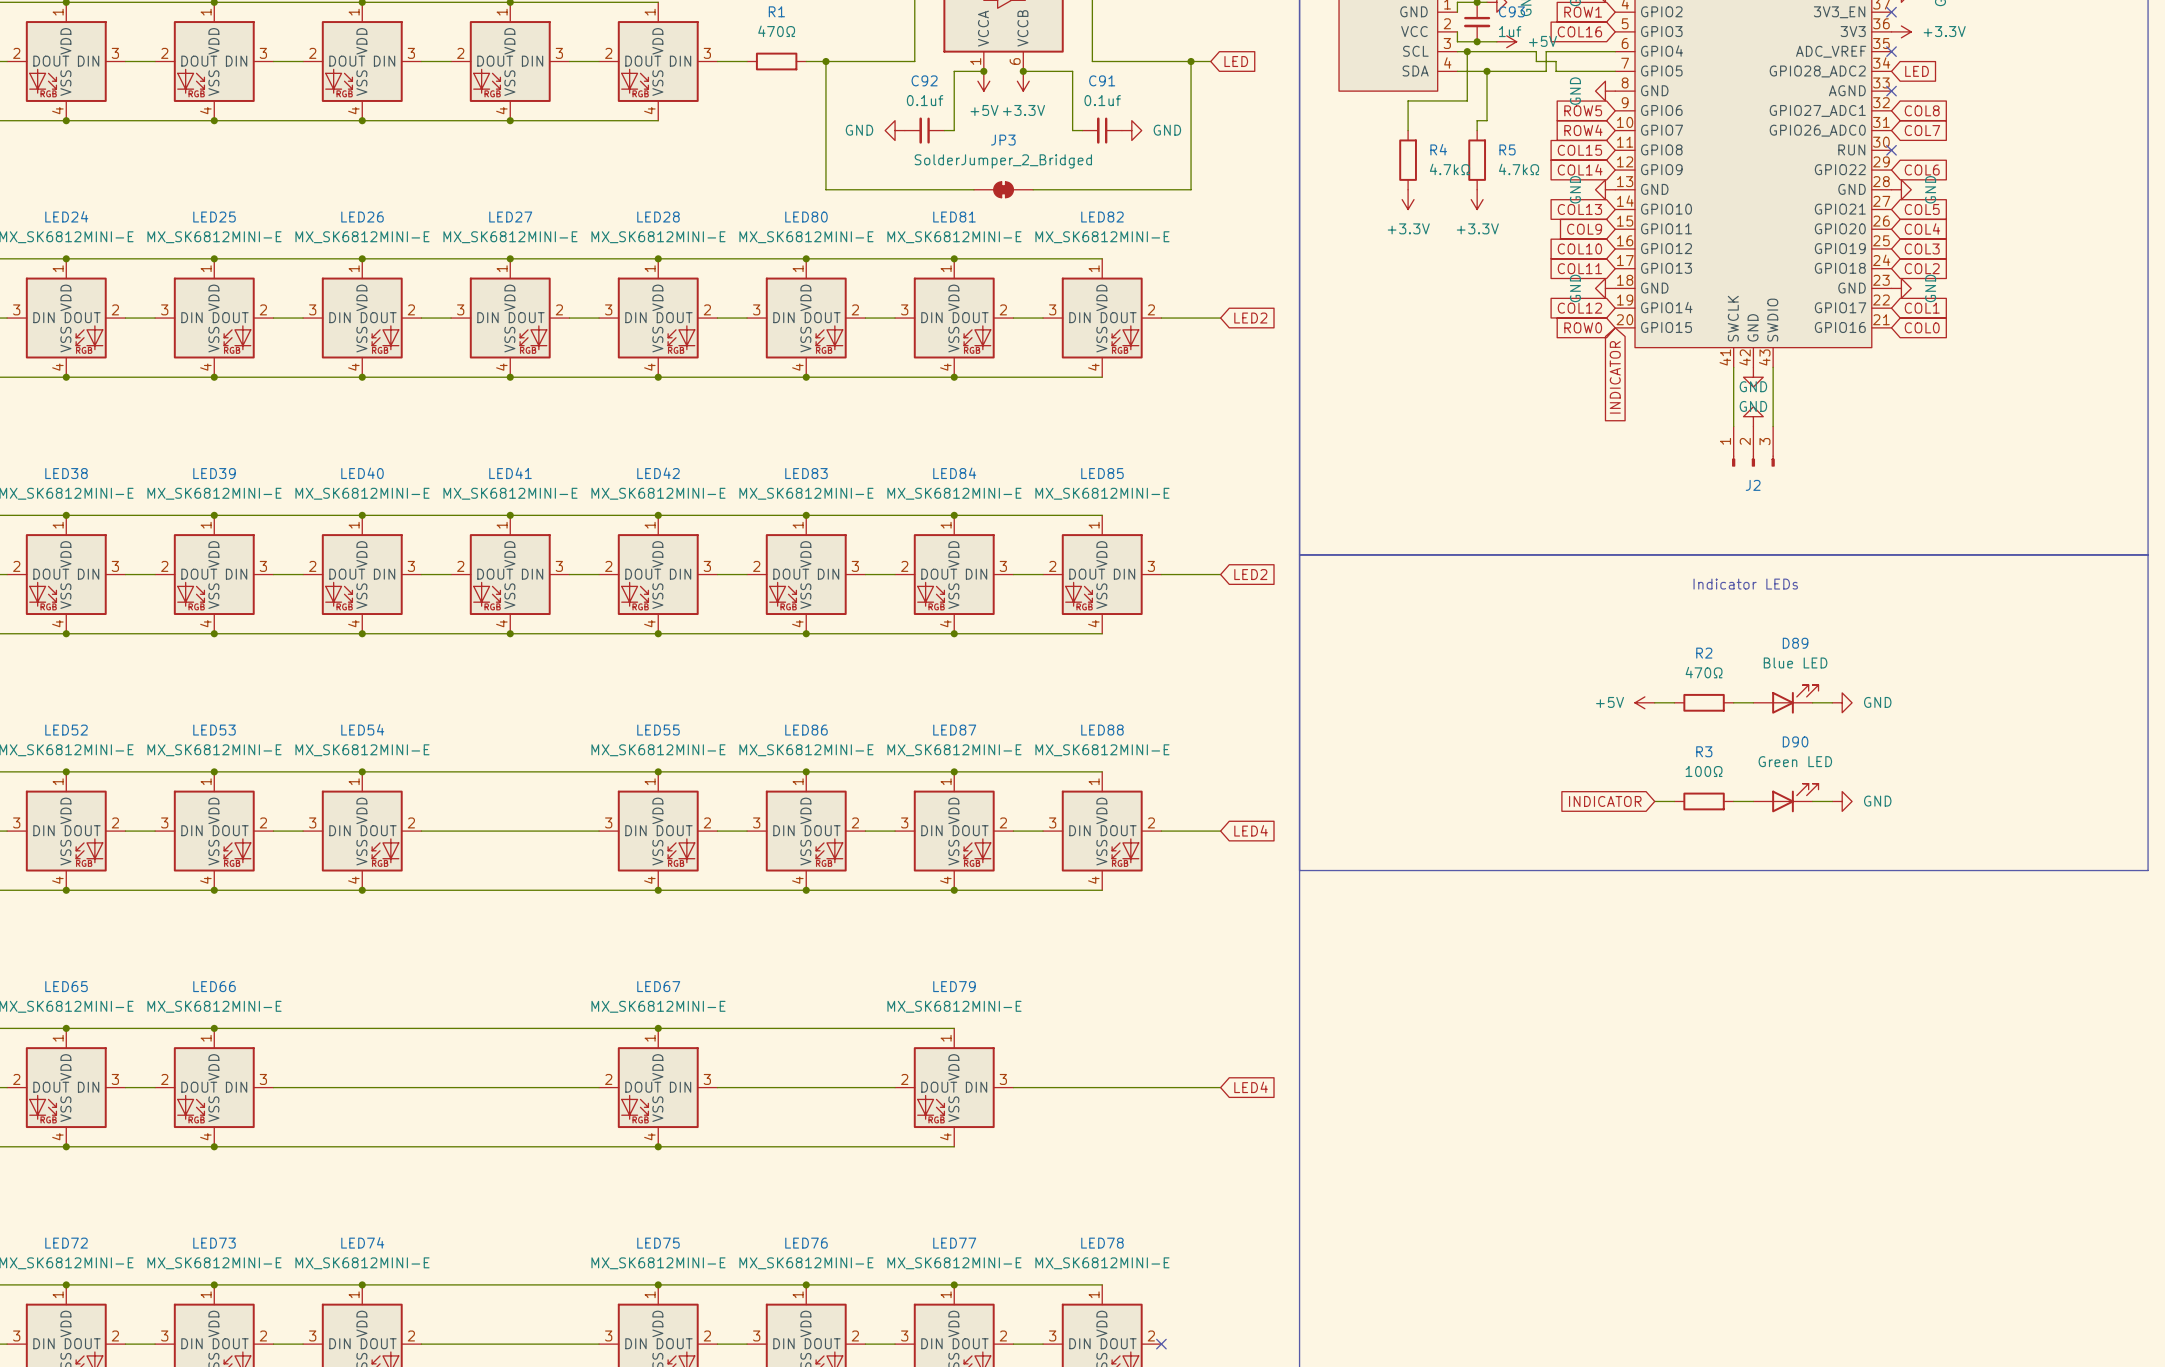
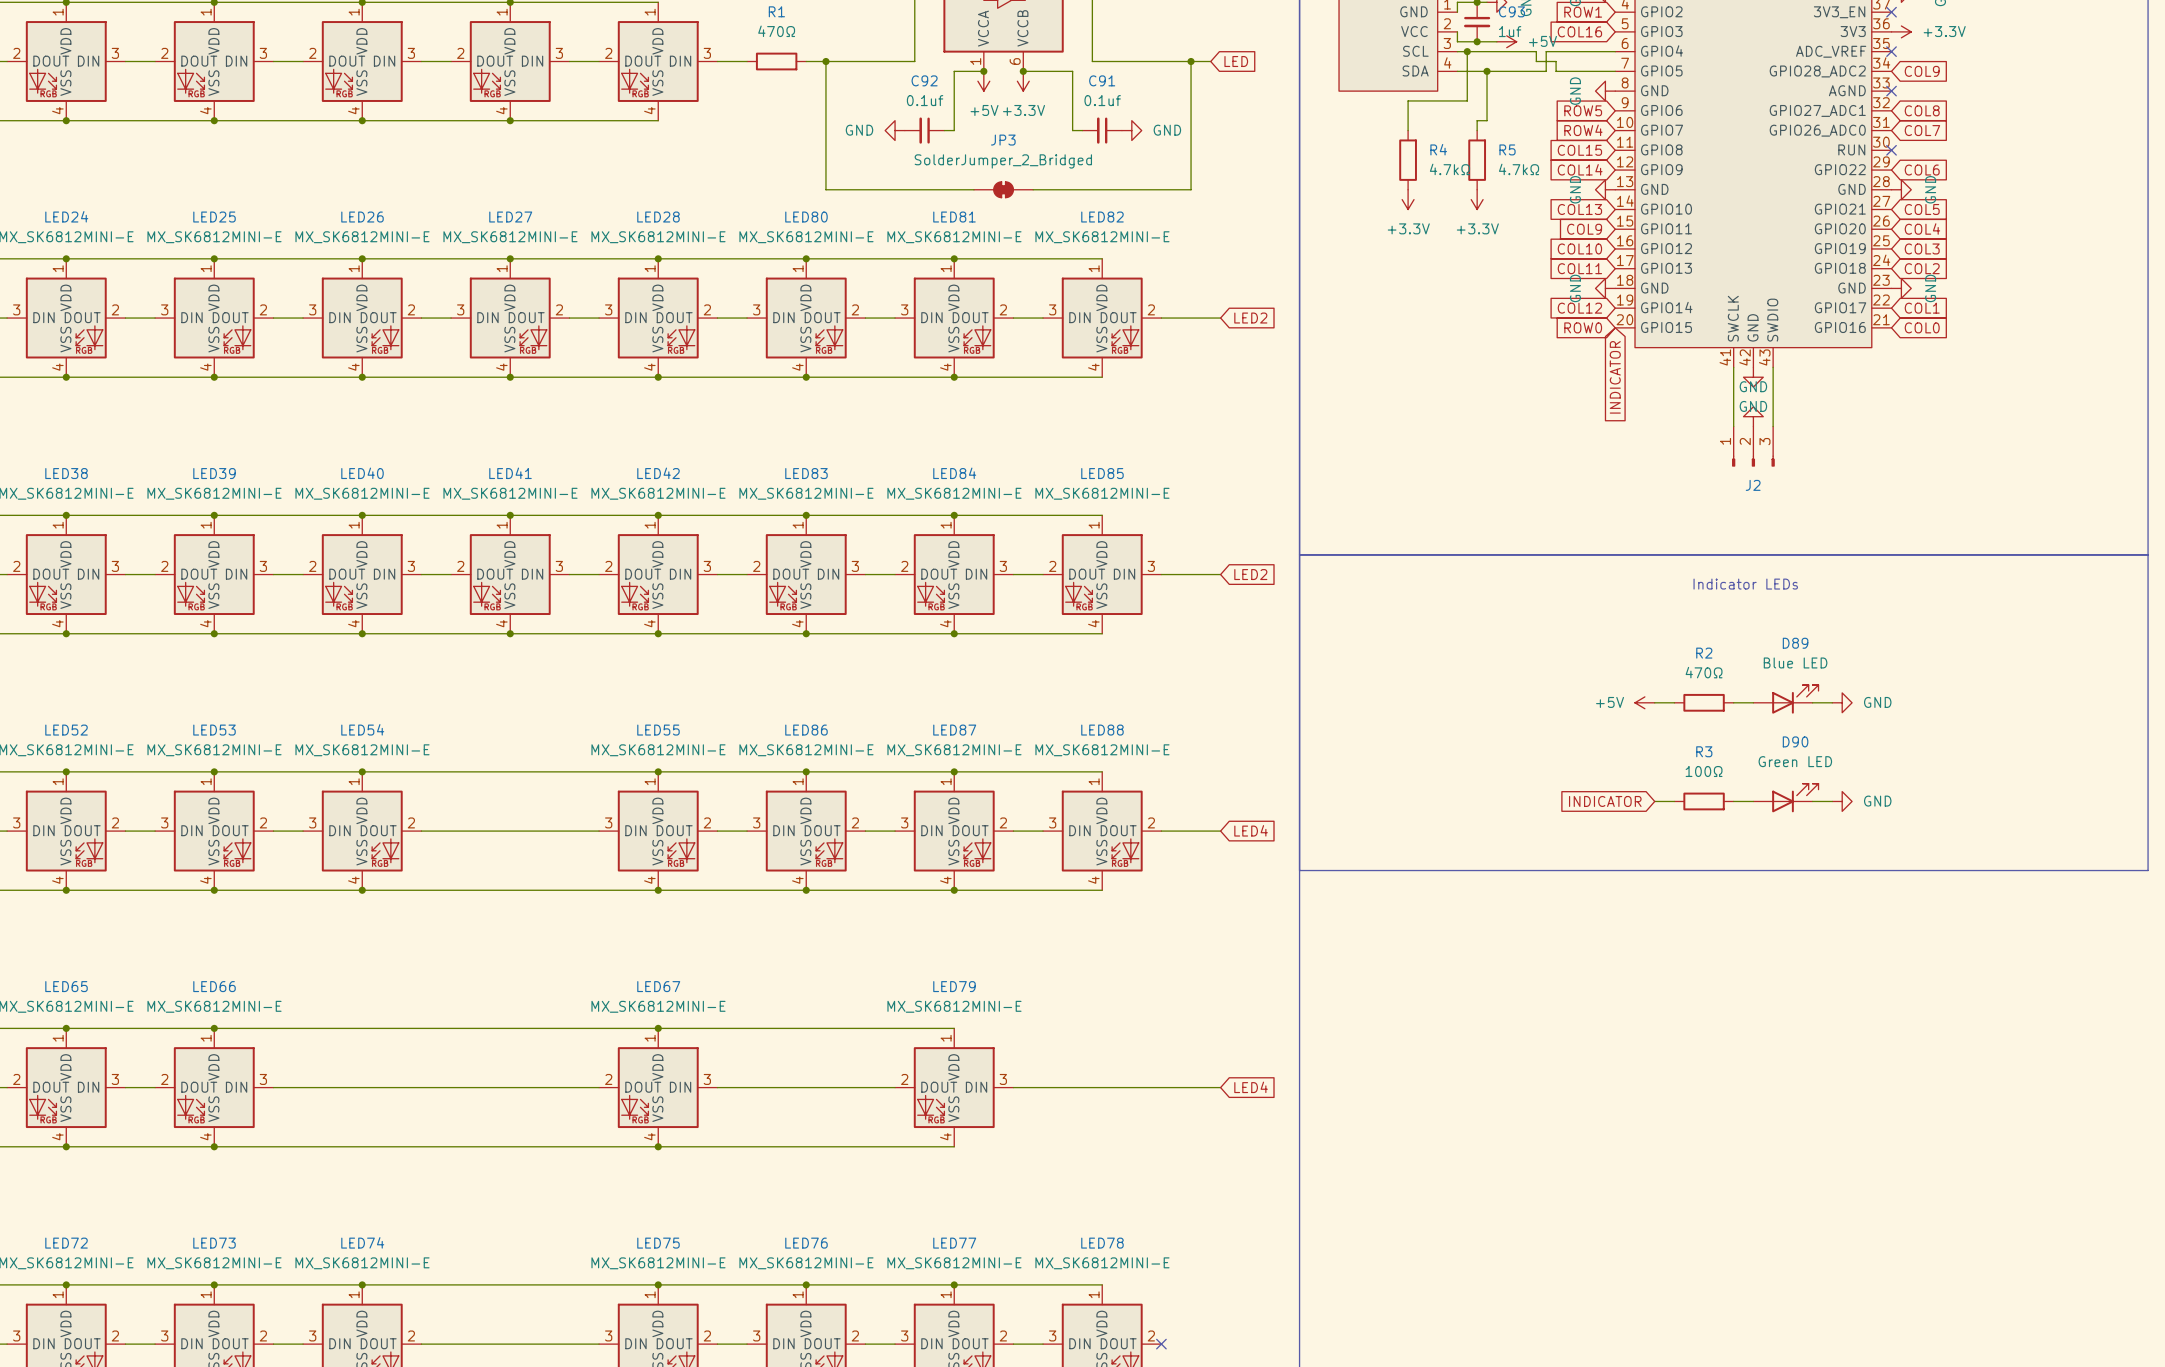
global label: LED (1917, 71) -> COL9 (1922, 71)

